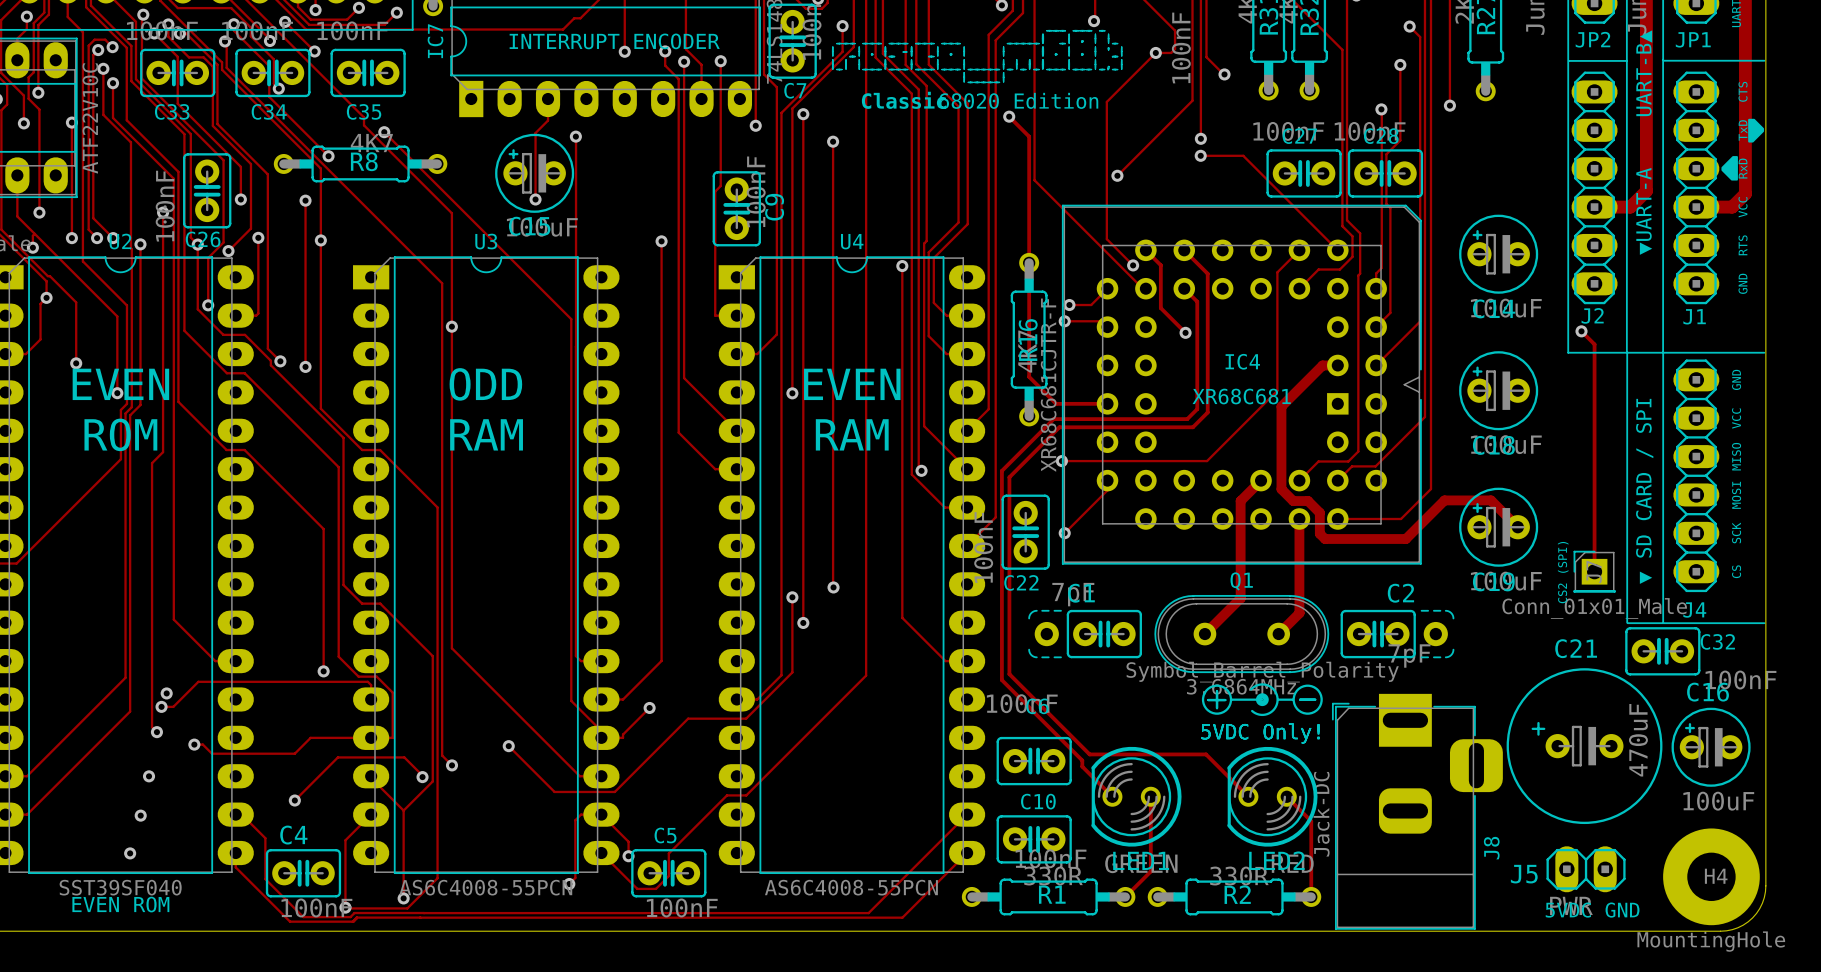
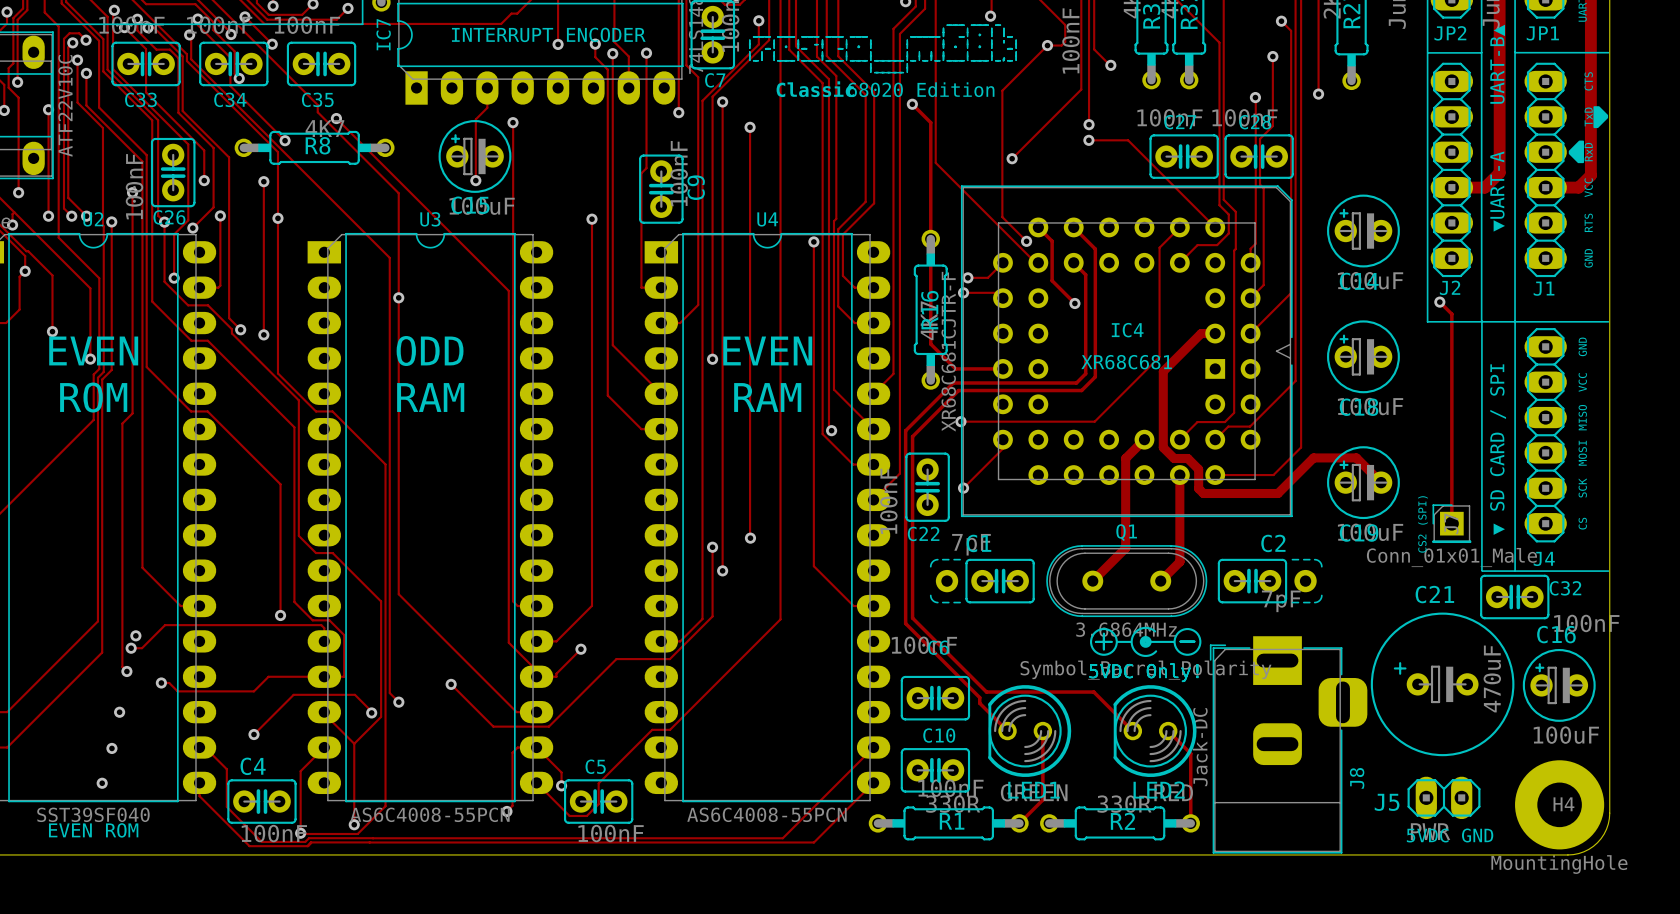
drawing shape: [1126, 661, 1399, 717] -> [1020, 626, 1272, 680]

